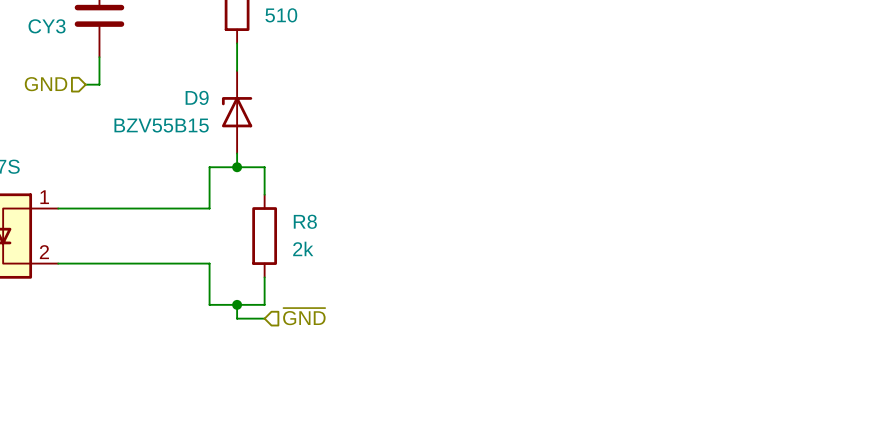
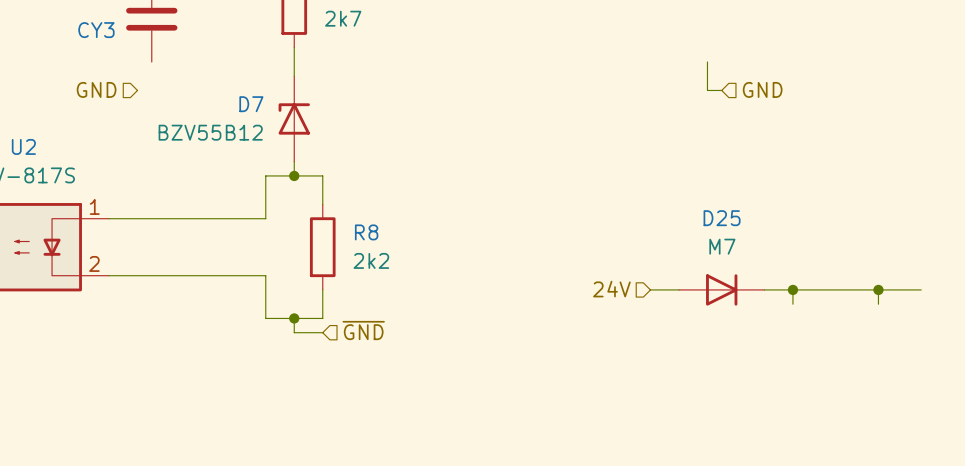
part value: 510 (281, 15) -> 2k7 (343, 18)
wire: (99, 57) (99, 84) (85, 84) -> none
wire: none -> (707, 61) (707, 90) (721, 90)
hierarchical label: none -> GND (762, 89)
D9 name: D9 (197, 97) -> D7 (251, 104)
D9 value: BZV55B15 (161, 125) -> BZV55B12 (210, 132)
R8 value: 2k (303, 248) -> 2k2 (371, 260)
hierarchical label: none -> 24V (611, 289)
wire: none -> (650, 289) (678, 289)
D25: none -> M7 (721, 289)
wire: none -> (764, 289) (921, 289)
wire: none -> (792, 289) (792, 304)
junction: none -> (792, 289)
wire: none -> (878, 289) (878, 304)
junction: none -> (878, 289)

